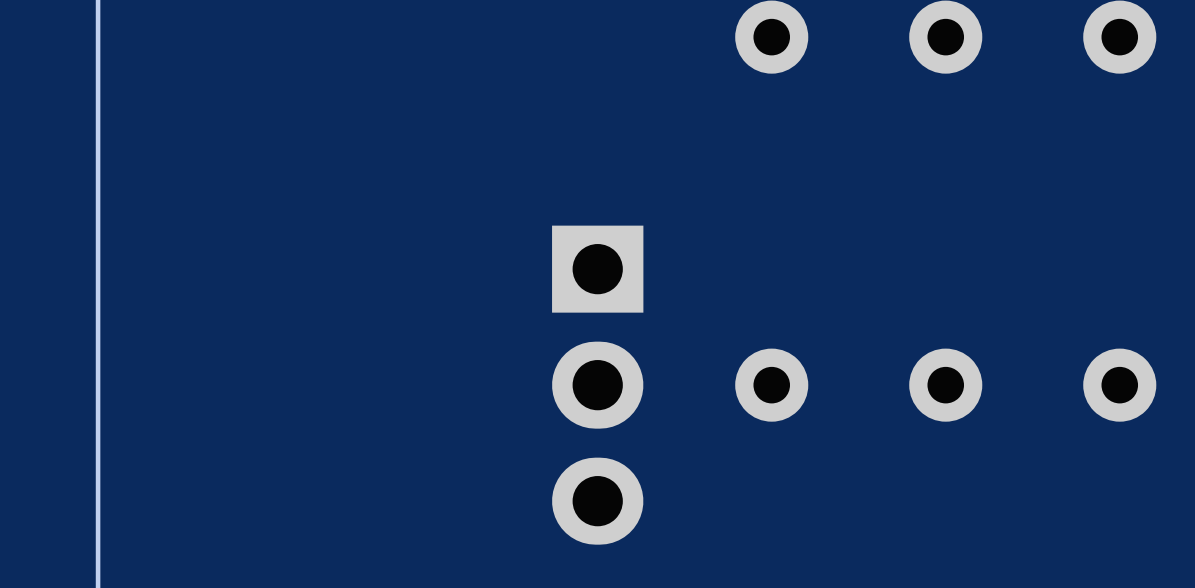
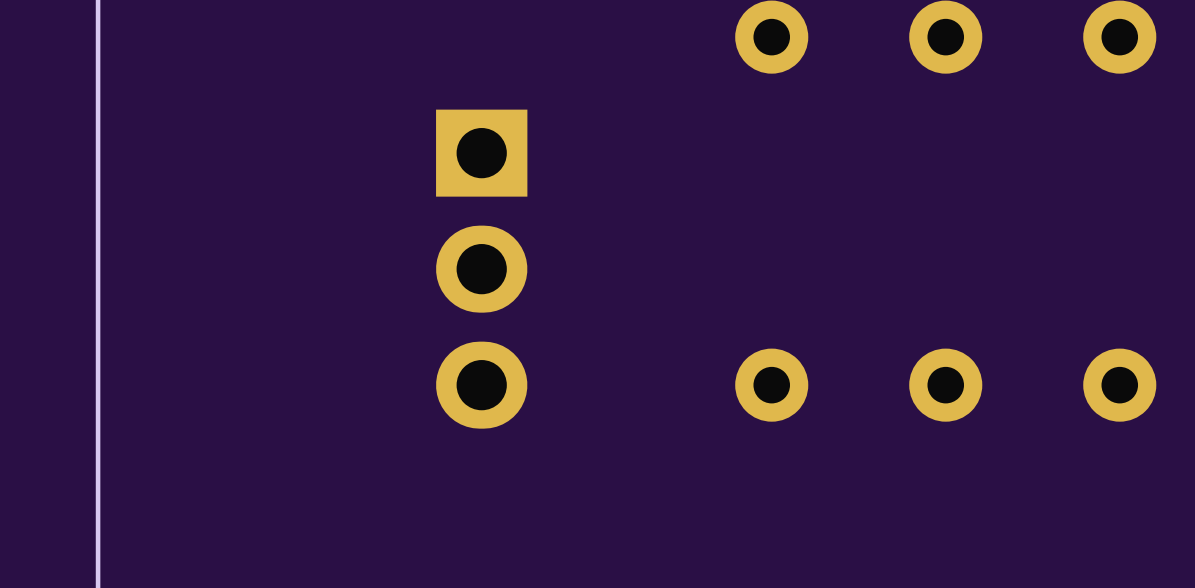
part position: (597, 385) -> (481, 269)

